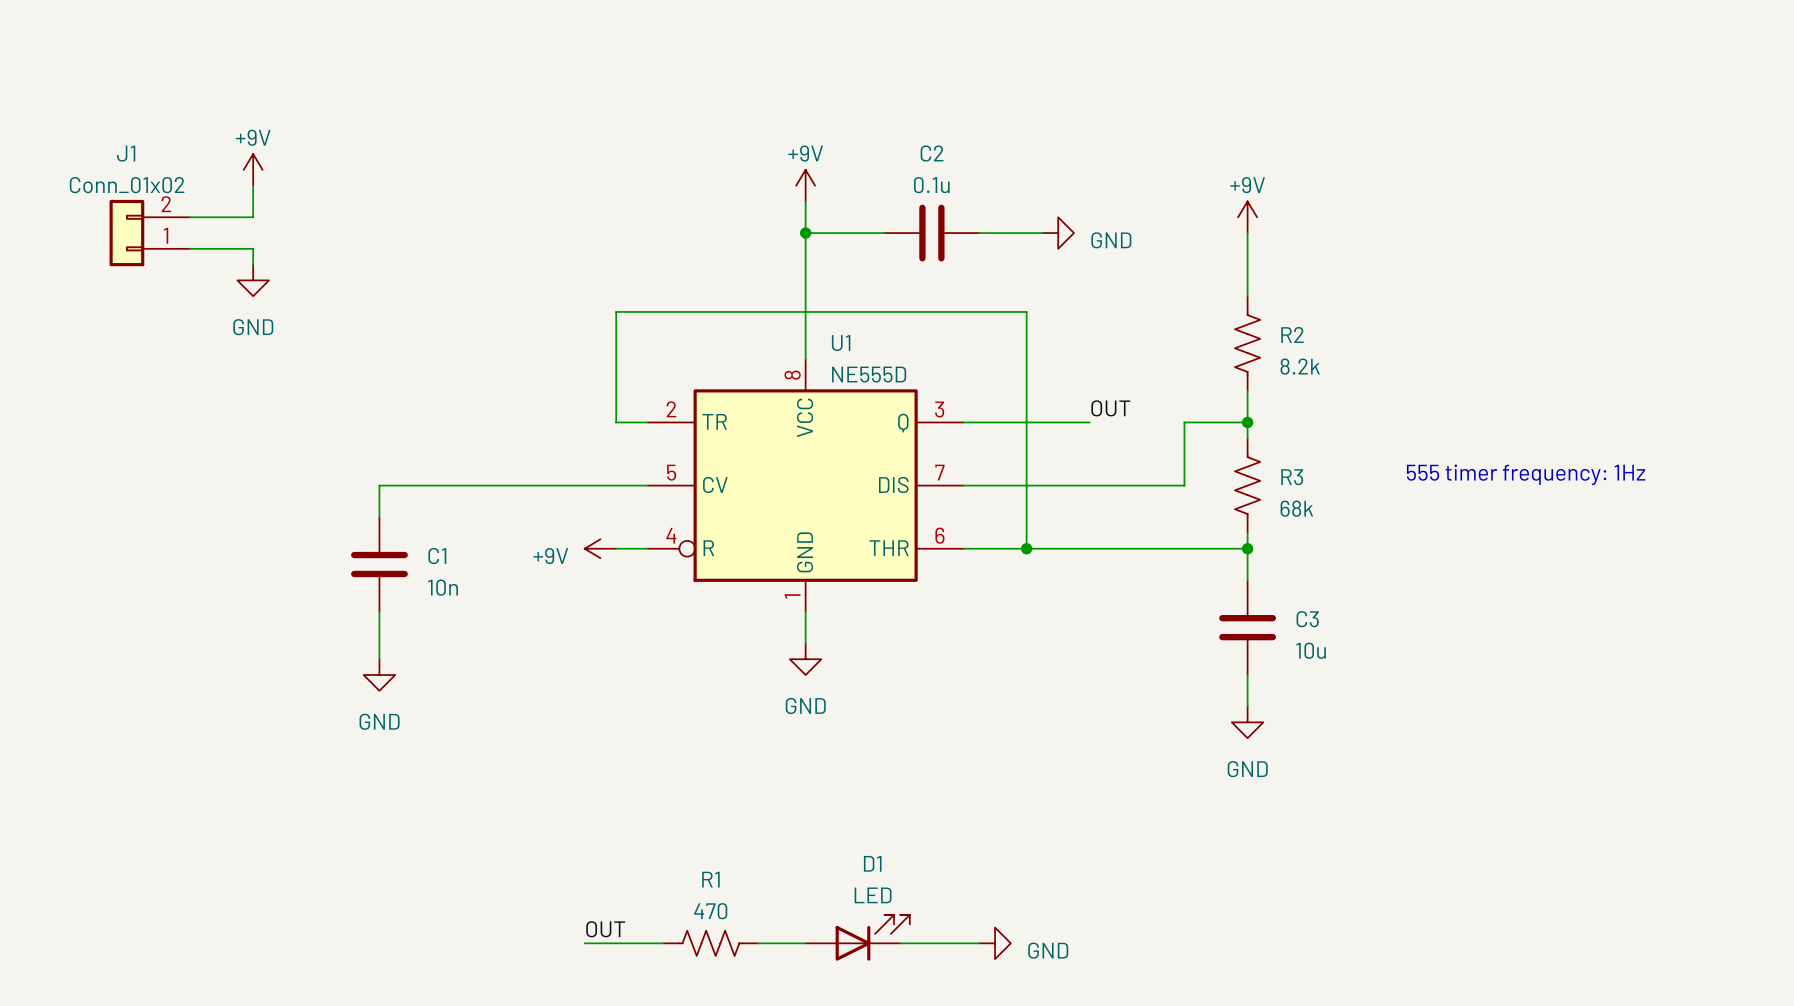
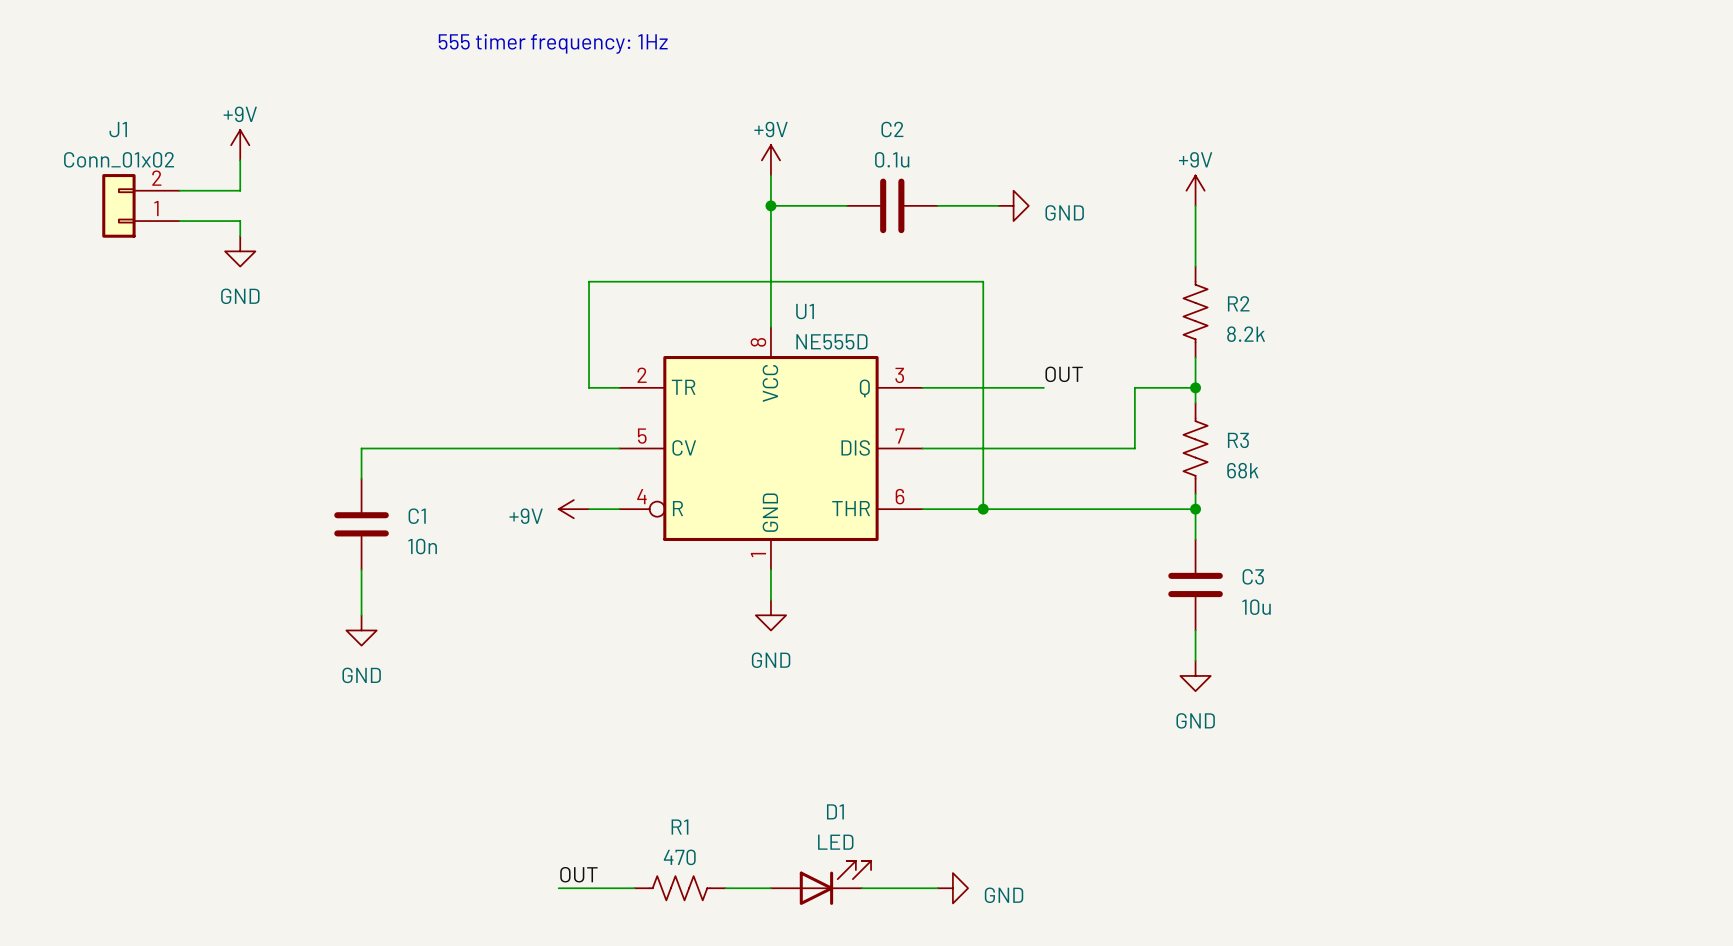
text: none -> 555 timer frequency: 1Hz (553, 43)
text: 555 timer frequency: 1Hz (1526, 474) -> none

